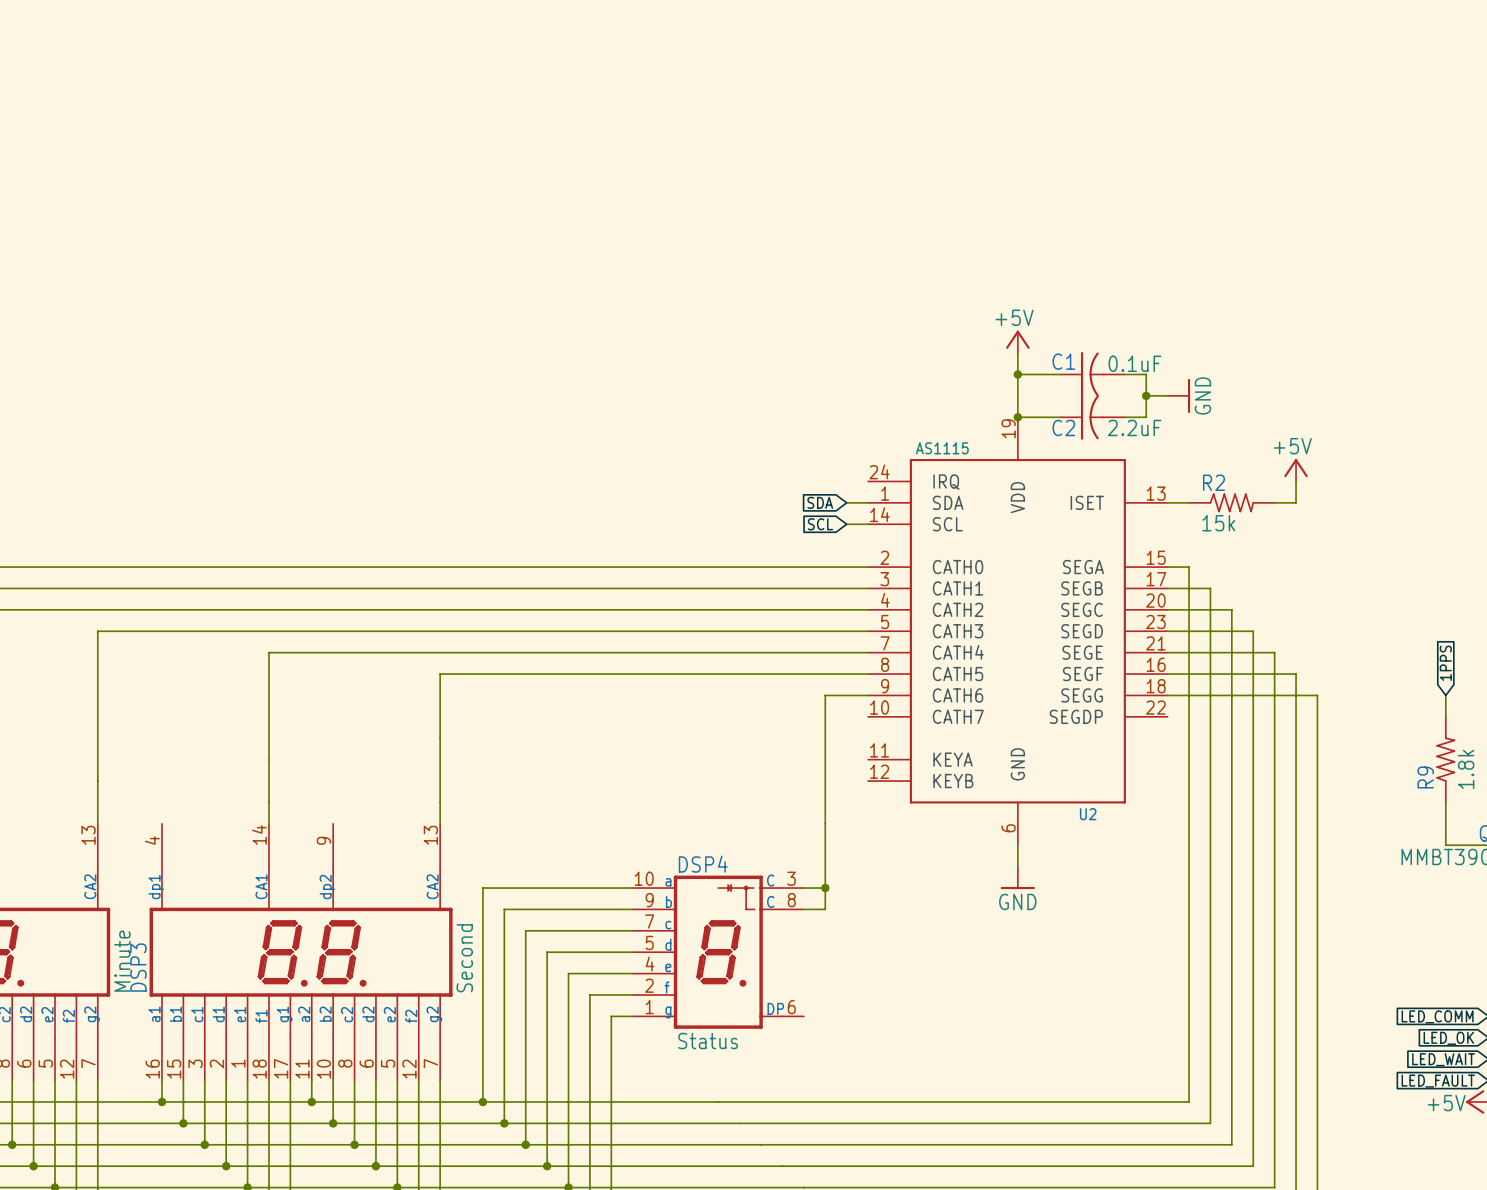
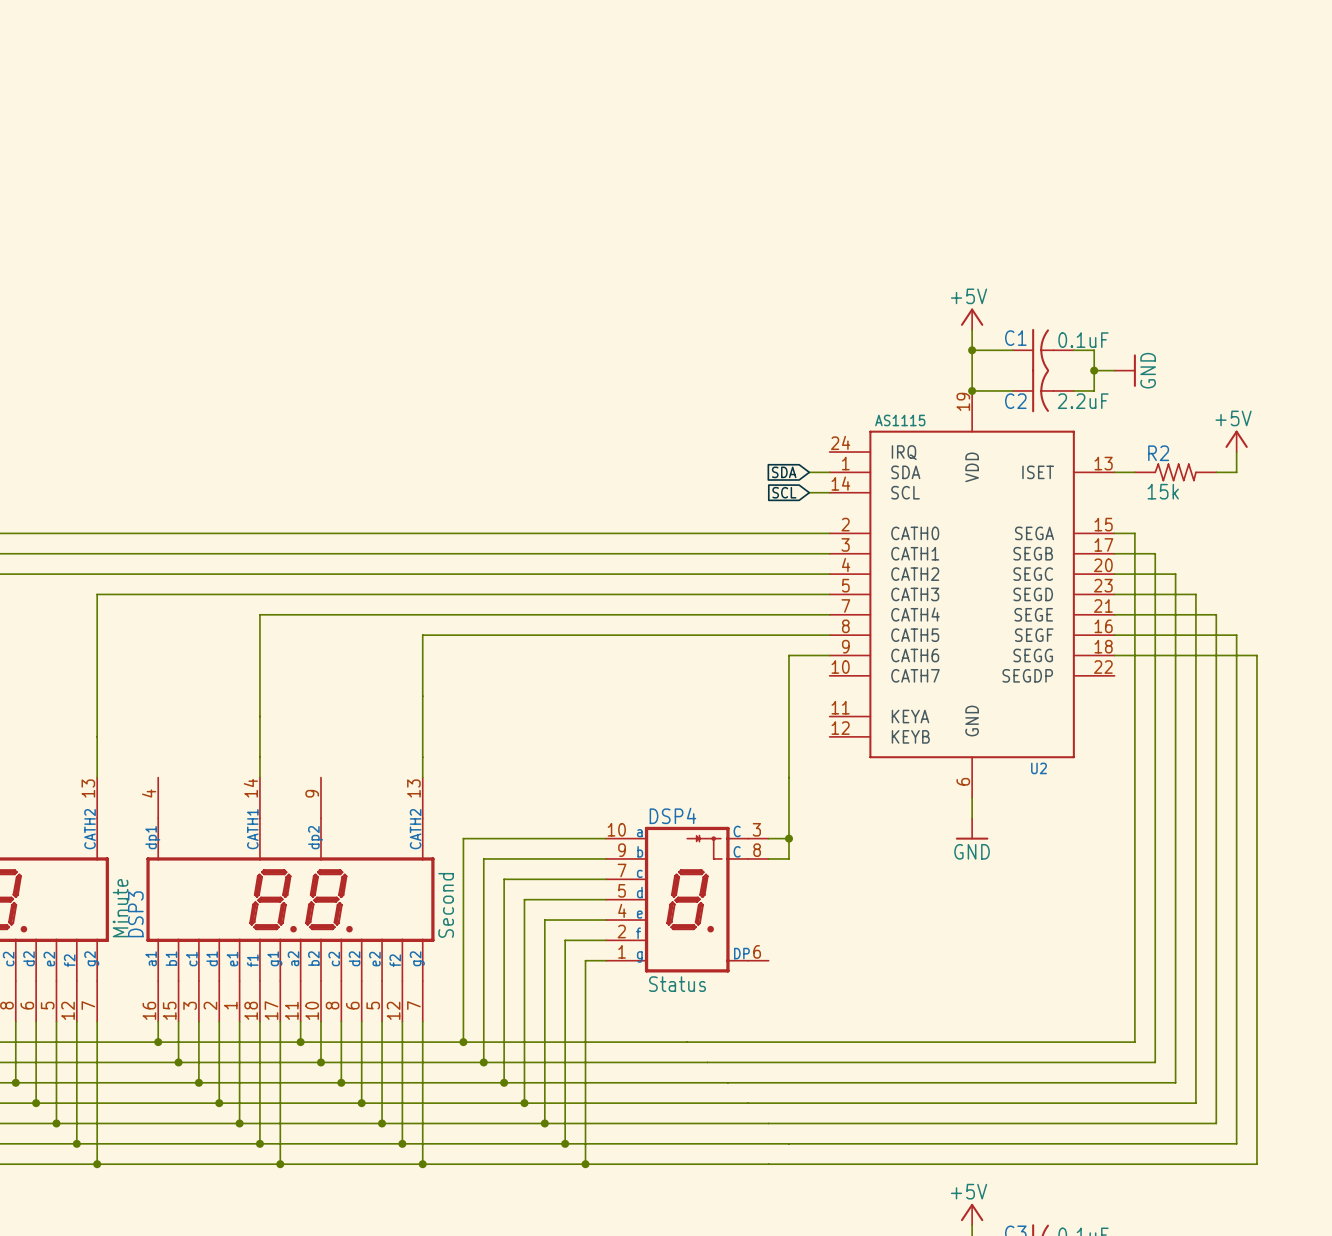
part text: CA2 (90, 886) -> CATH2 (90, 829)
DSP3 text: CA1 (261, 886) -> CATH1 (252, 829)
DSP3 text: CA2 (432, 886) -> CATH2 (415, 829)

